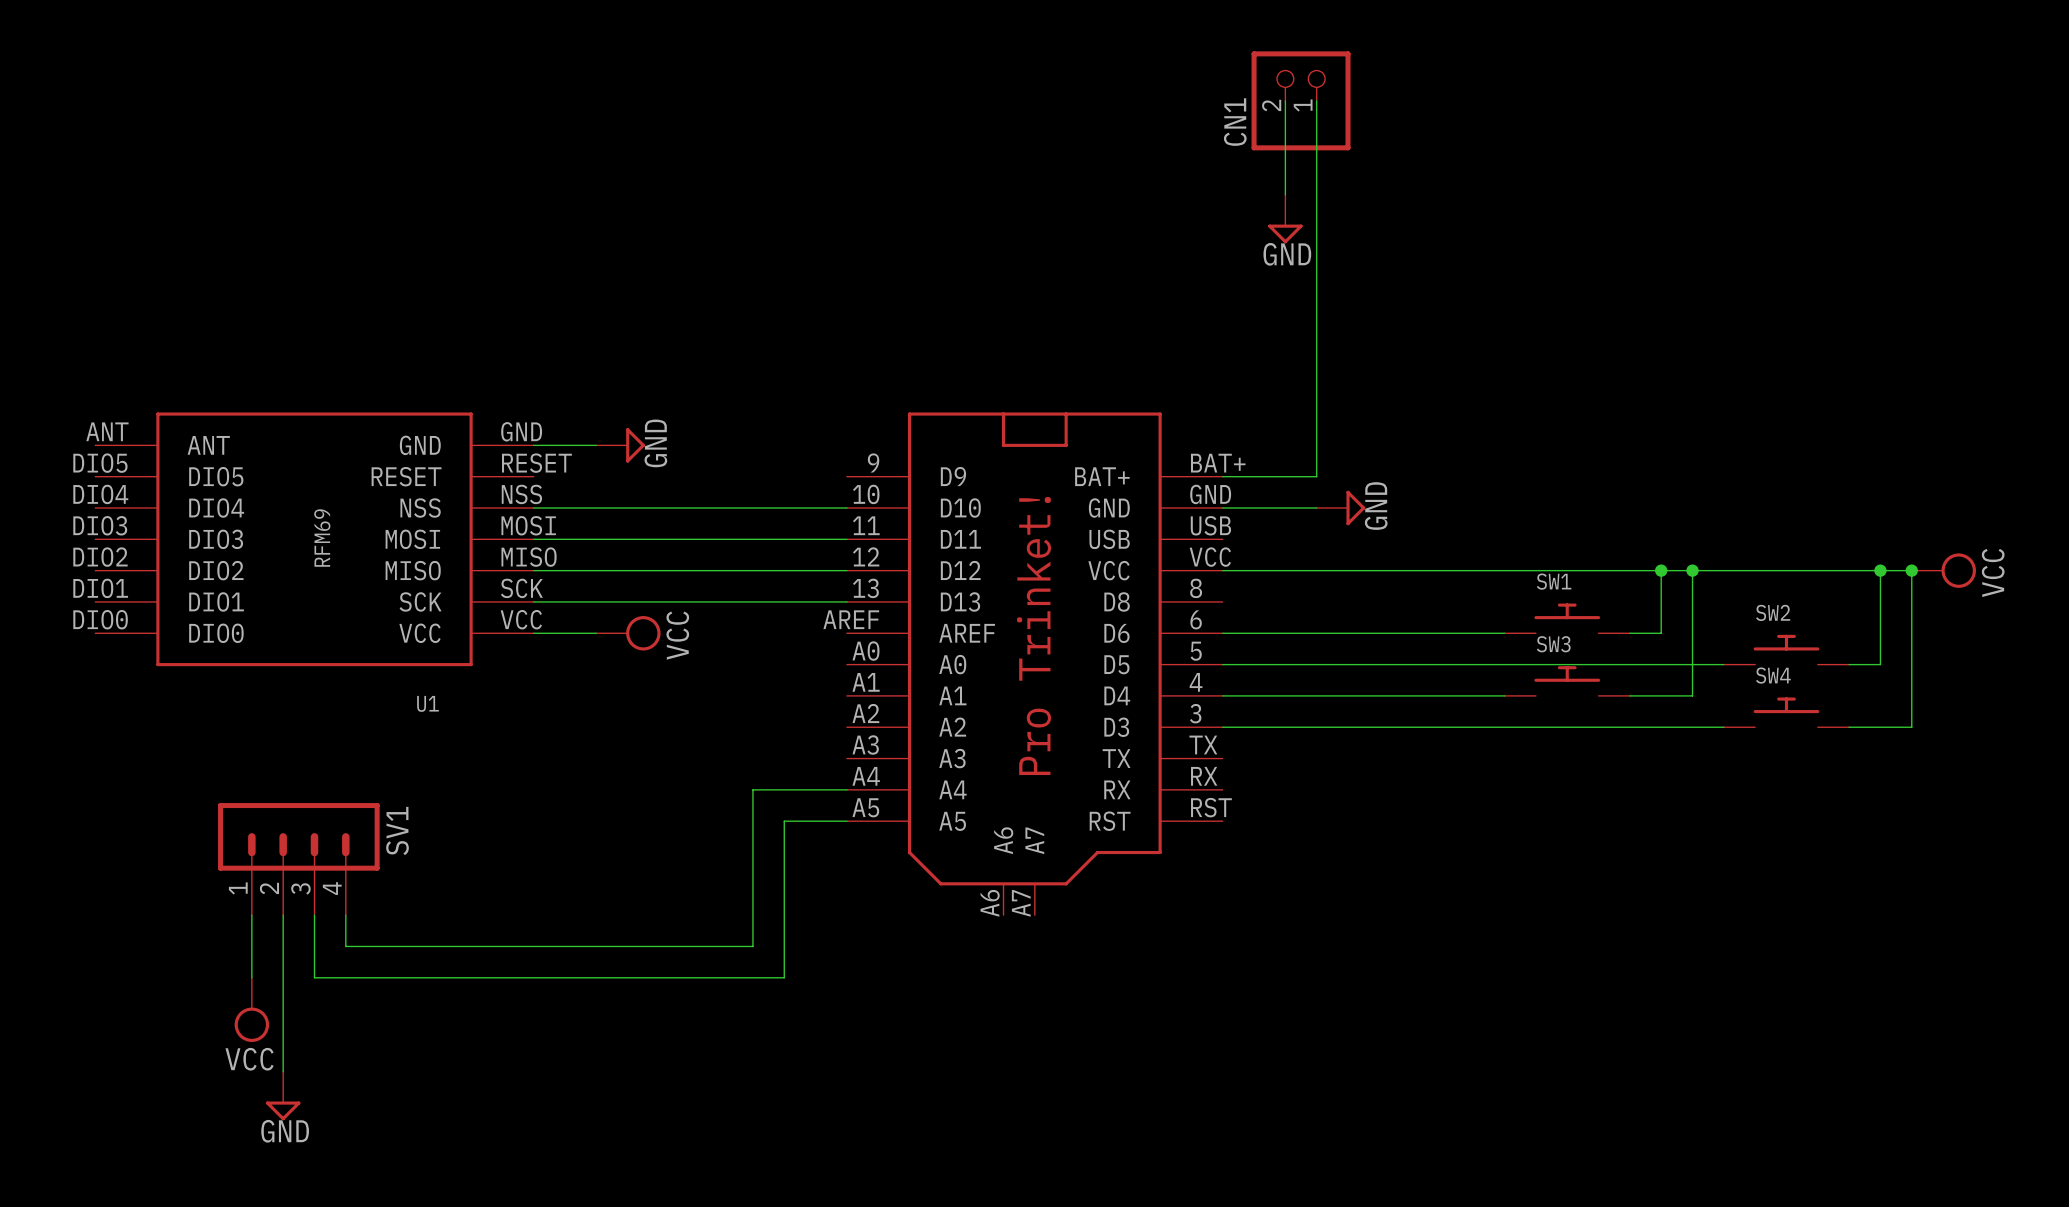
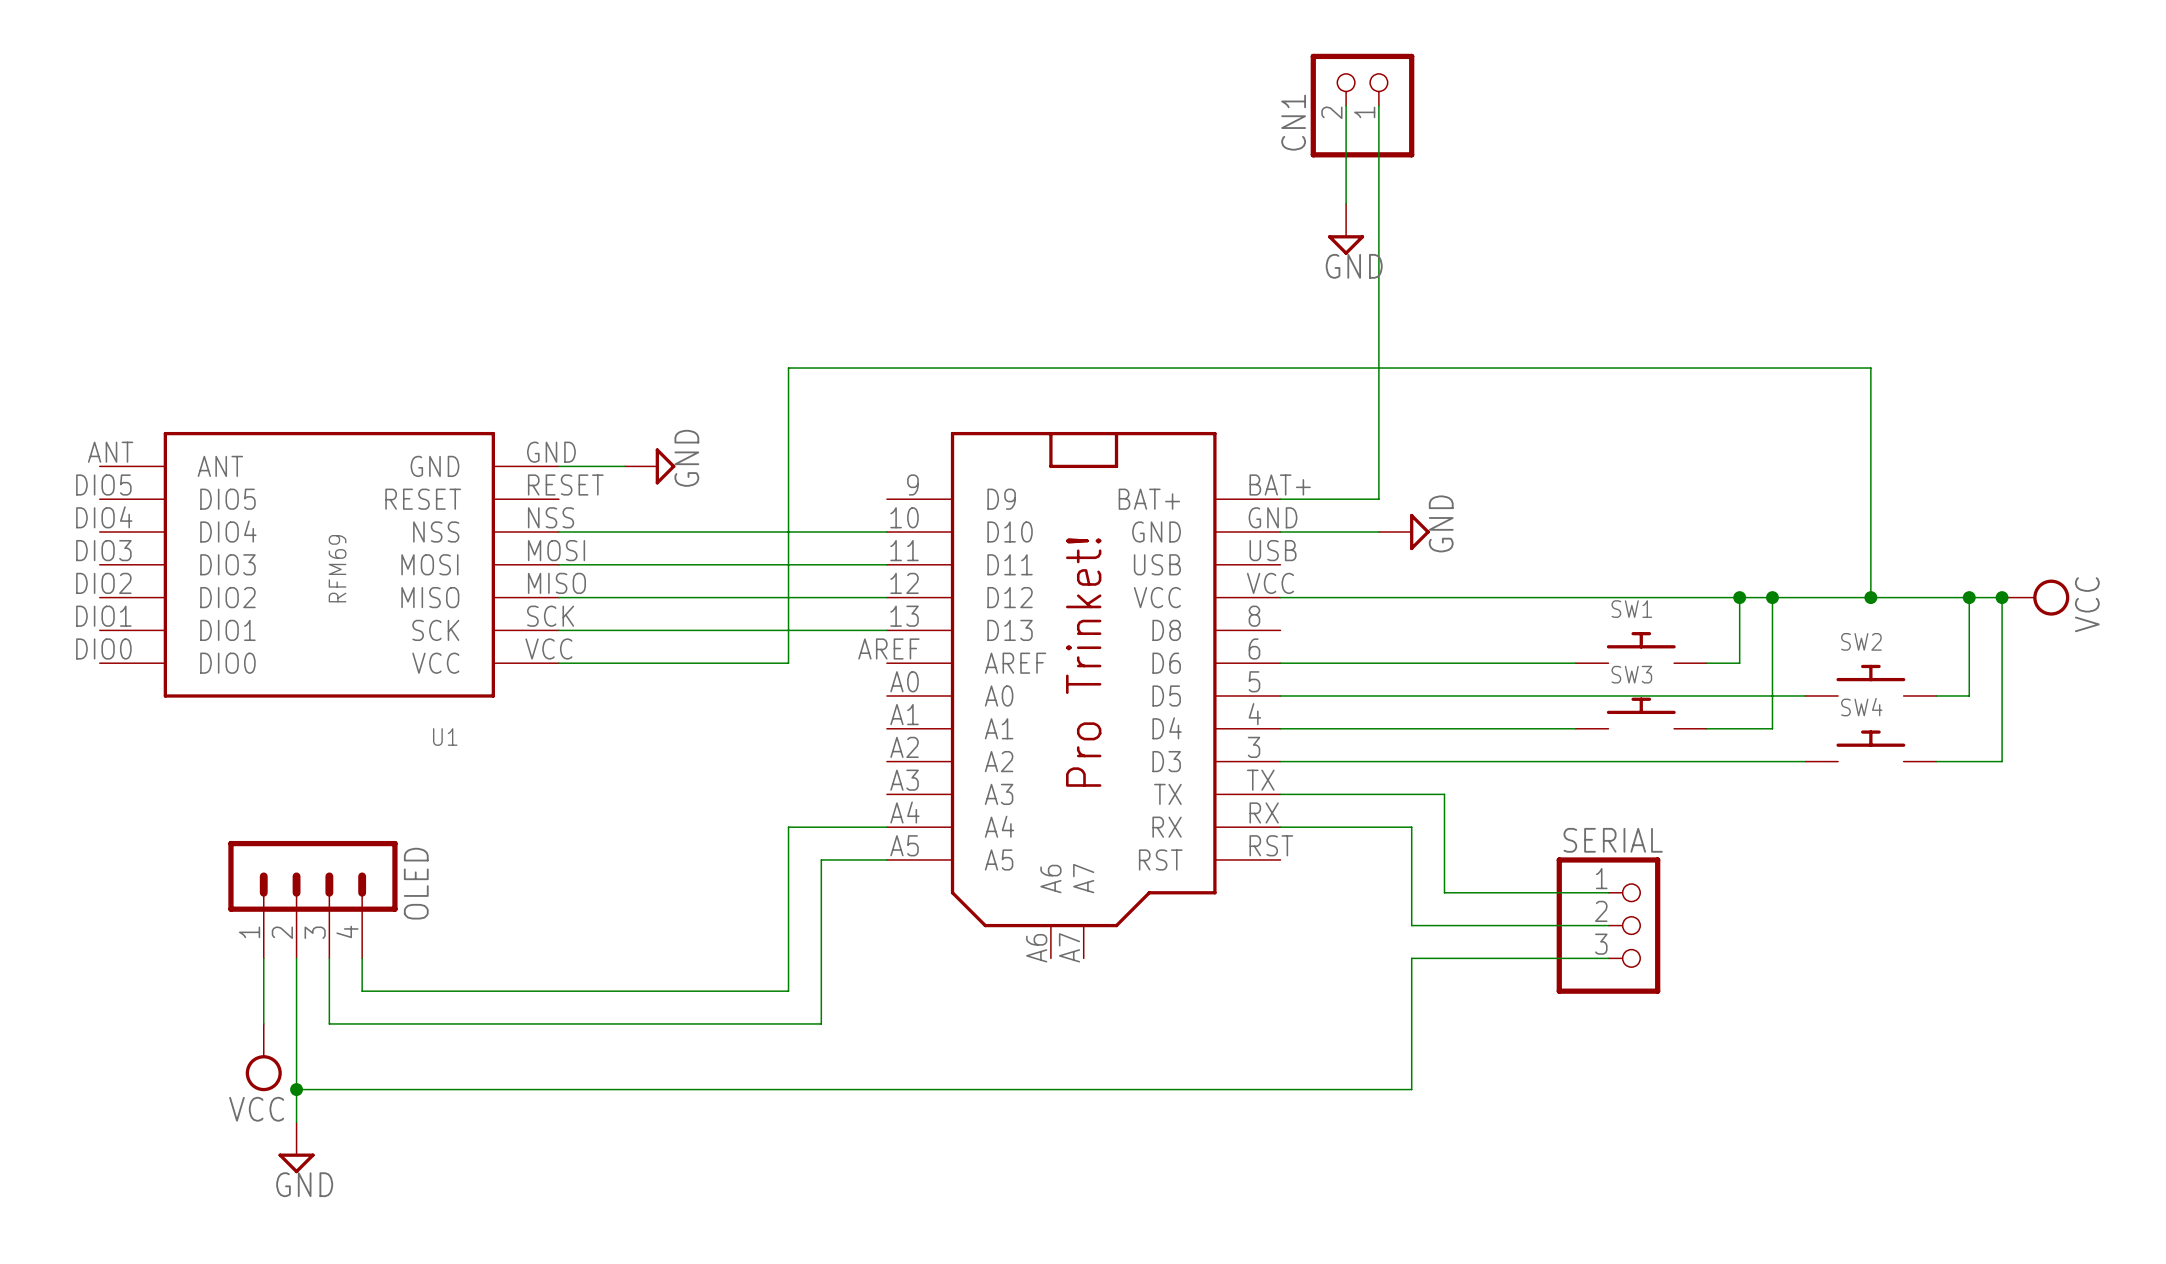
wire: none -> (1870, 597) (1870, 368) (788, 368) (788, 663) (624, 663)
junction: none -> (1870, 597)
power symbol: VCC (628, 633) -> none
wire: none -> (1280, 794) (1444, 794) (1444, 892) (1608, 892)
wire: none -> (1280, 827) (1411, 827) (1411, 925) (1608, 925)
SV1 name: SV1 (397, 831) -> OLED (416, 883)
SERIAL: none -> (1608, 925)
wire: none -> (1608, 958) (1411, 958) (1411, 1089) (296, 1089)
junction: none -> (296, 1089)

